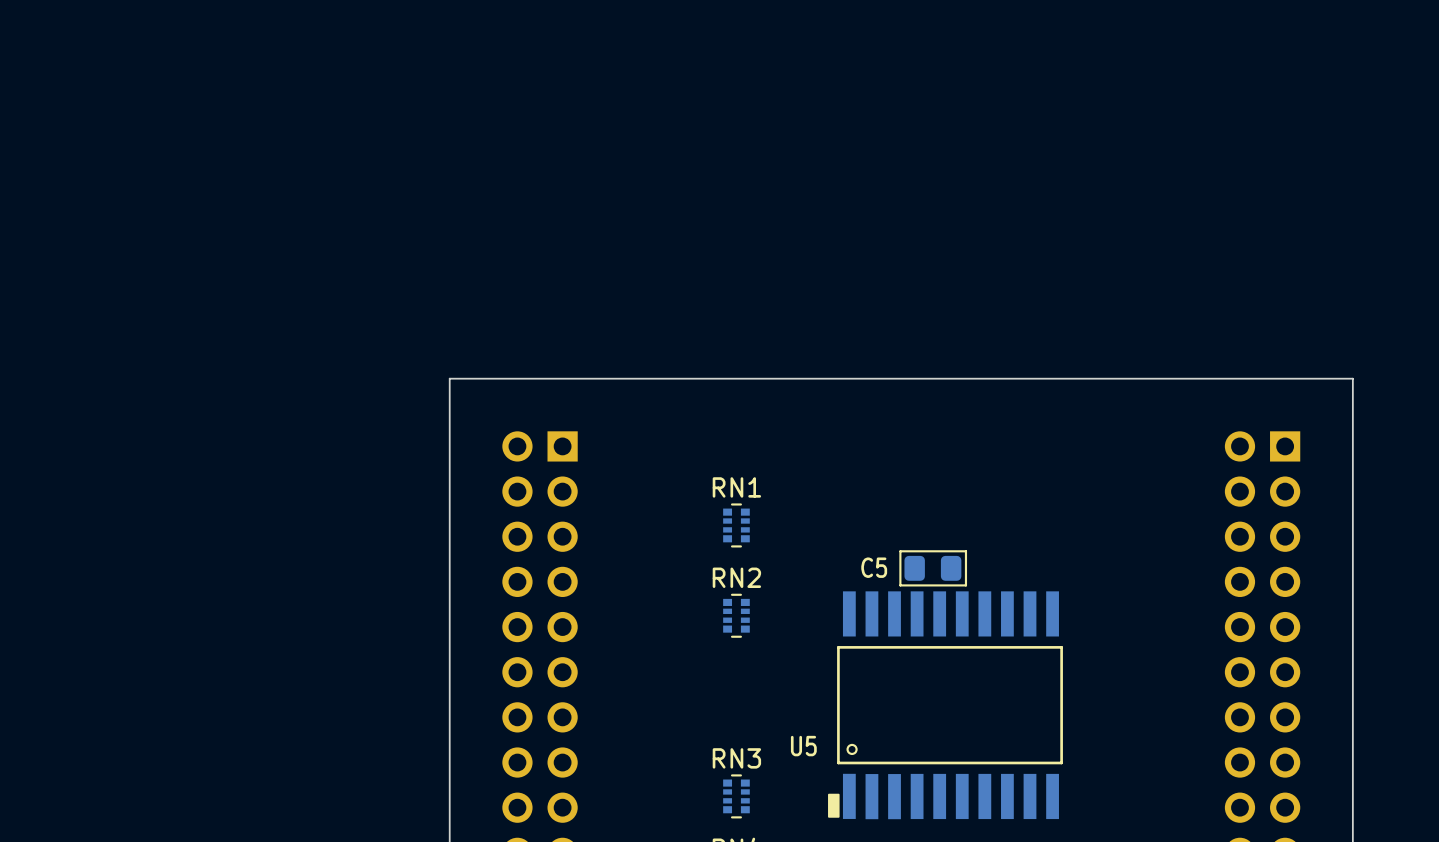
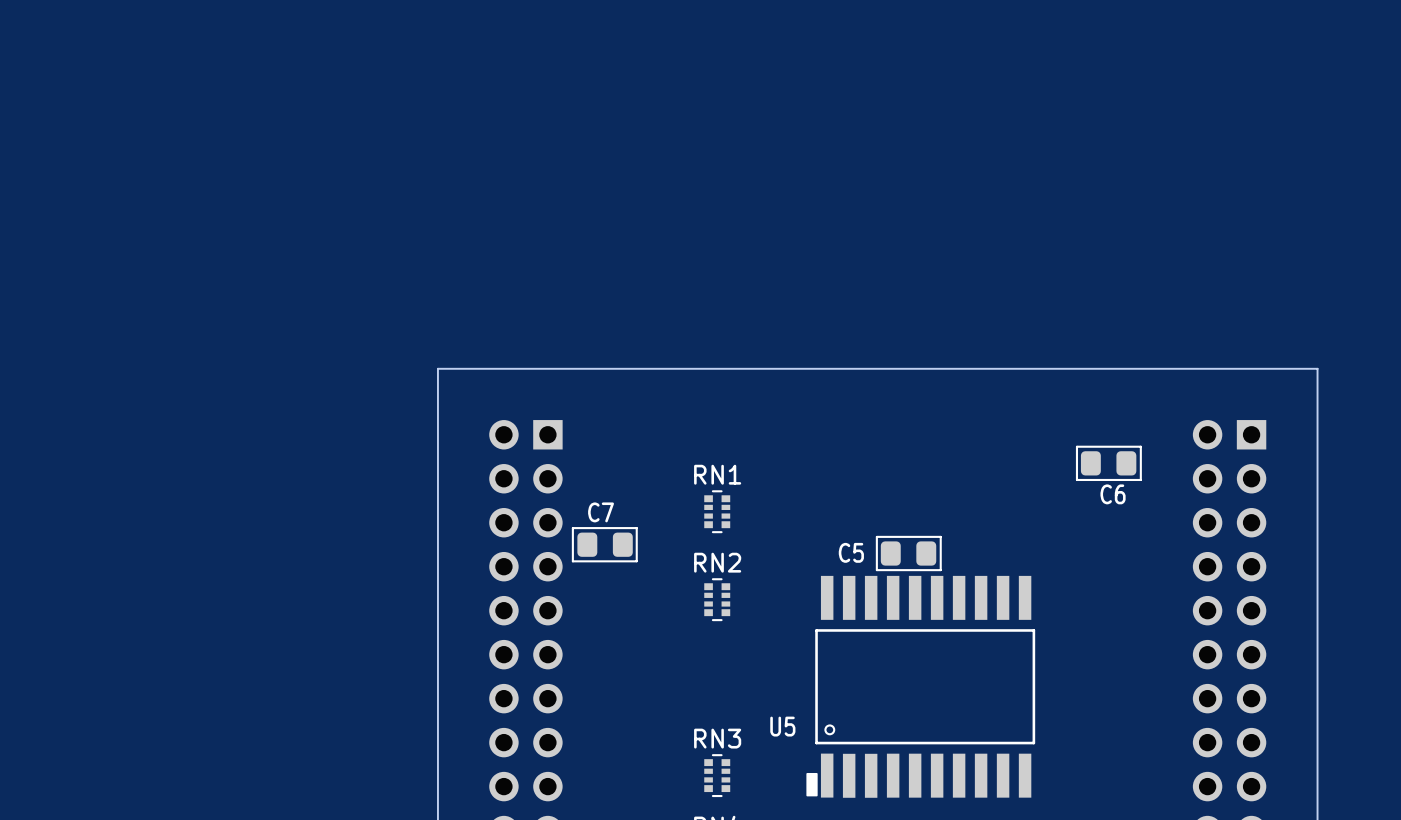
C6: none -> (1108, 463)
C7: none -> (604, 544)

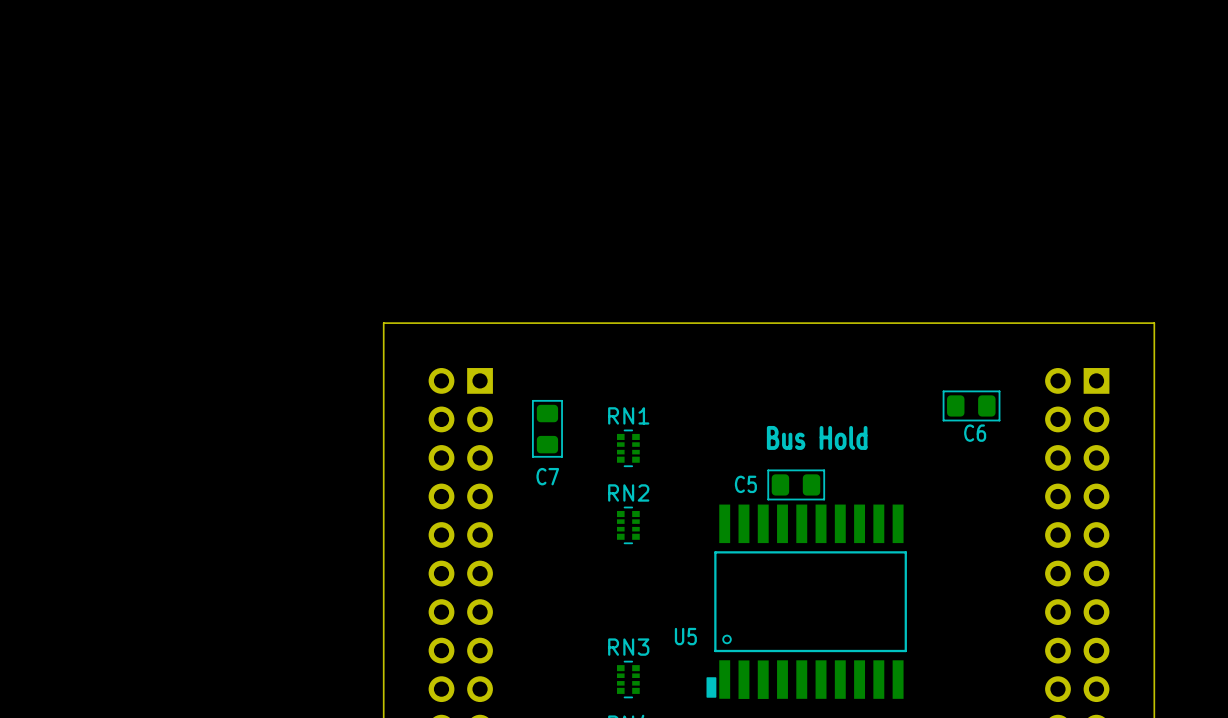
text: none -> Bus Hold (817, 437)
C7 name position: C7 (601, 512) -> C7 (547, 476)
C7 rotation: 0° (604, 544) -> 90° clockwise (547, 428)
C7 position: (604, 544) -> (547, 428)

